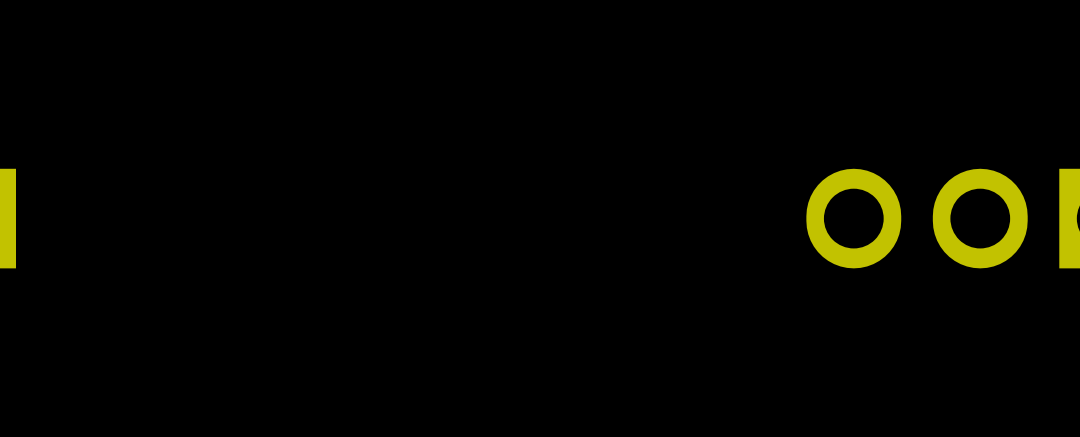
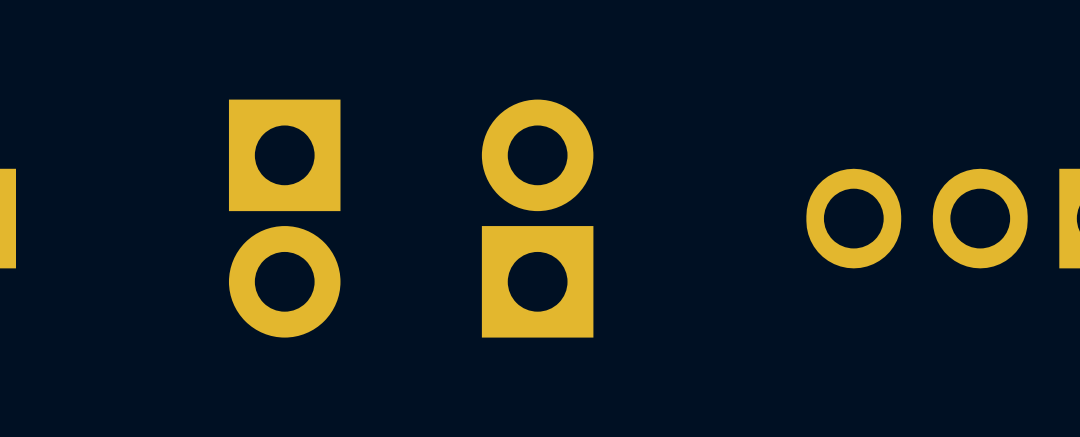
part: none -> (284, 218)
part: none -> (537, 218)

